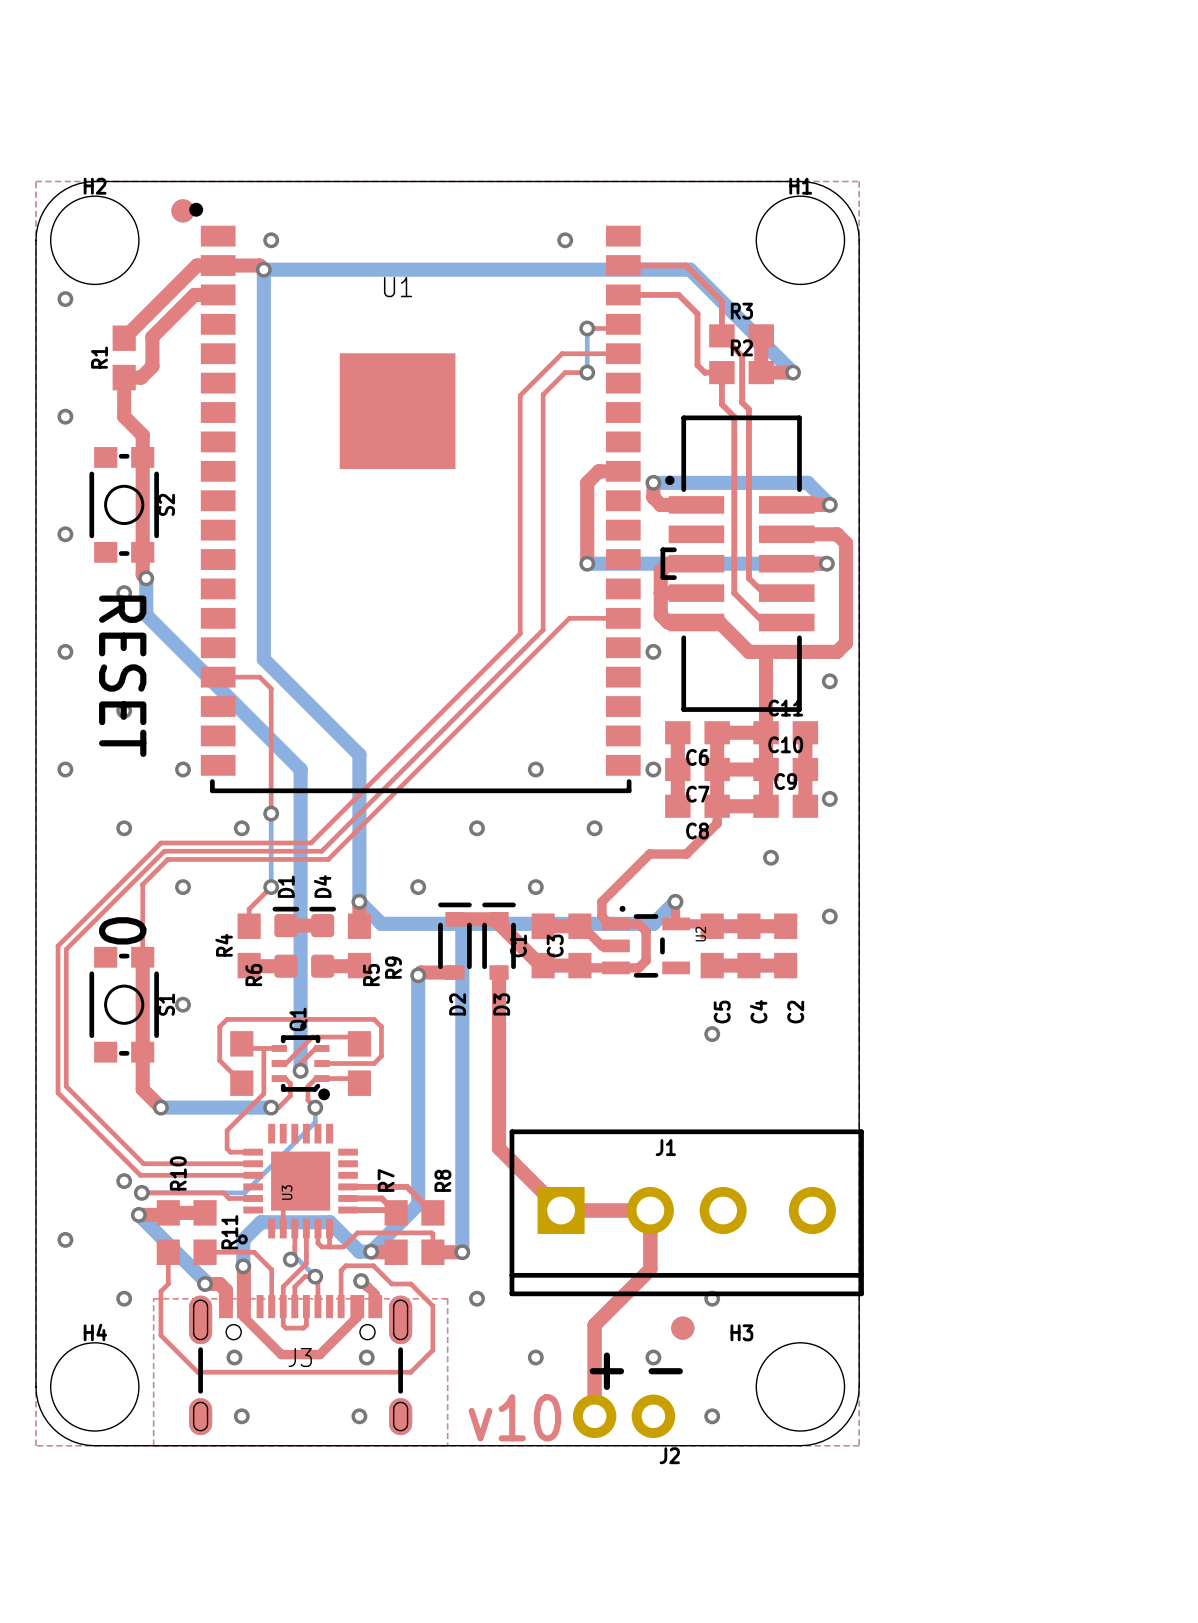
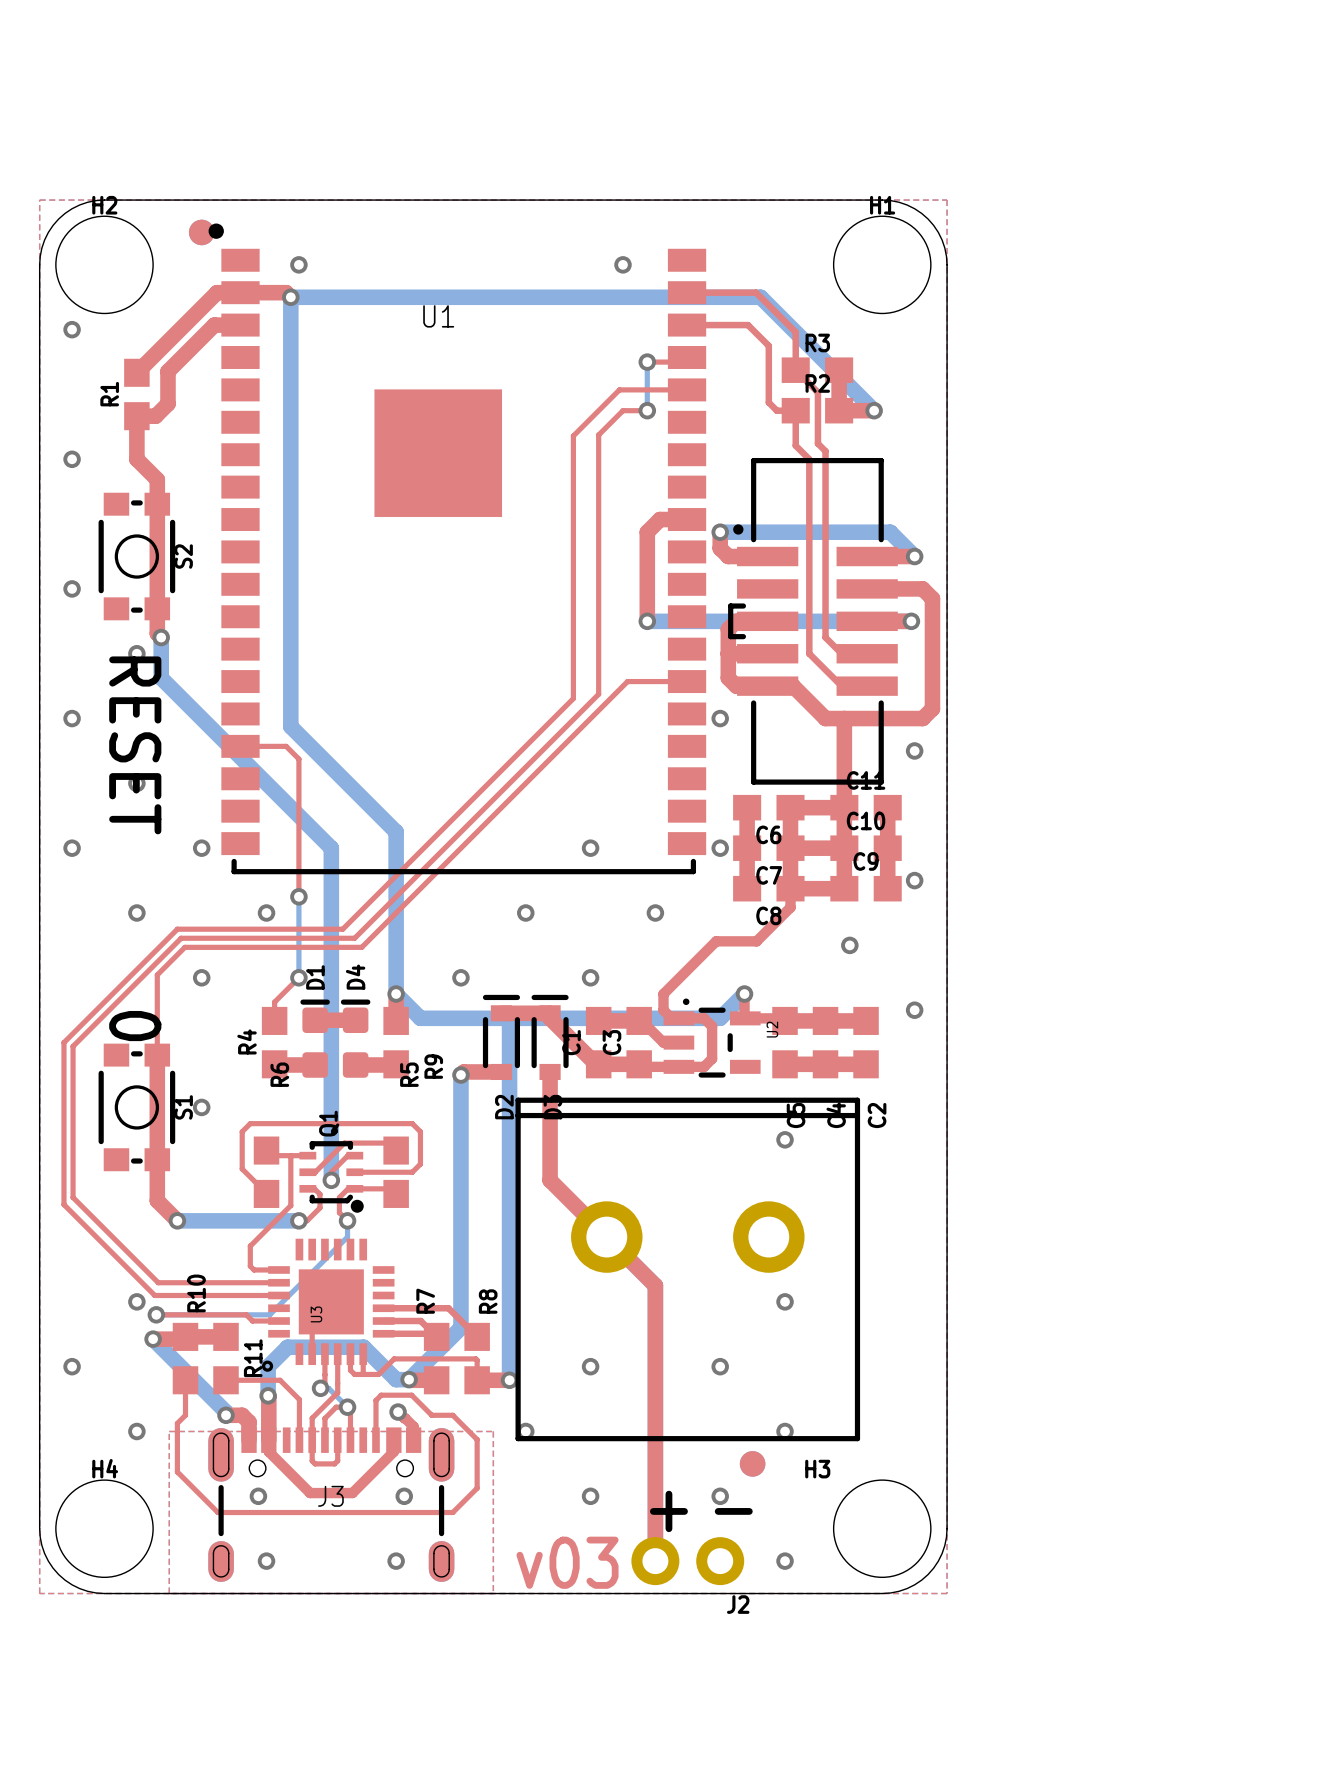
top track: (499, 1070) (499, 1148) (561, 1210) (650, 1210) (650, 1269) (594, 1325) -> (550, 1180) (655, 1285) (655, 1460)
part: none -> (687, 1269)
via: none -> (785, 1301)
J1: (686, 1212) -> none
via: none -> (590, 1366)
via: none -> (720, 1366)
text: v10 (514, 1417) -> v03 (567, 1562)

